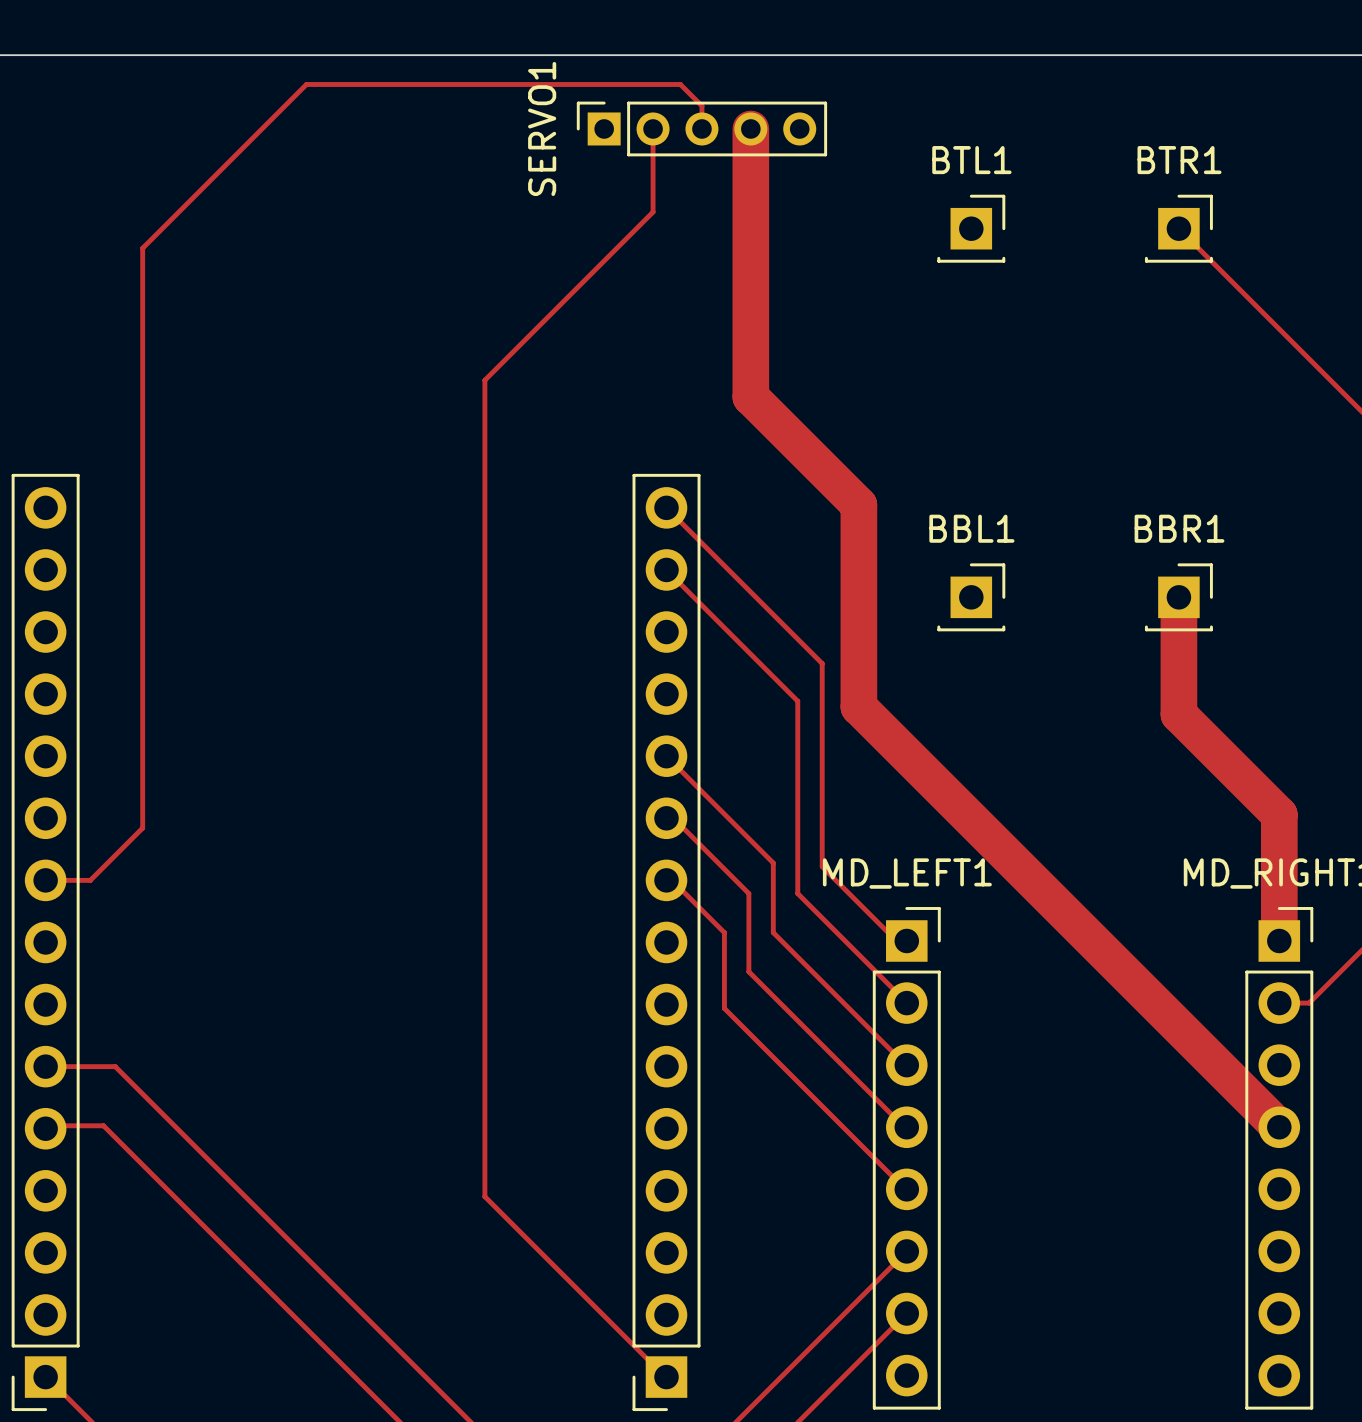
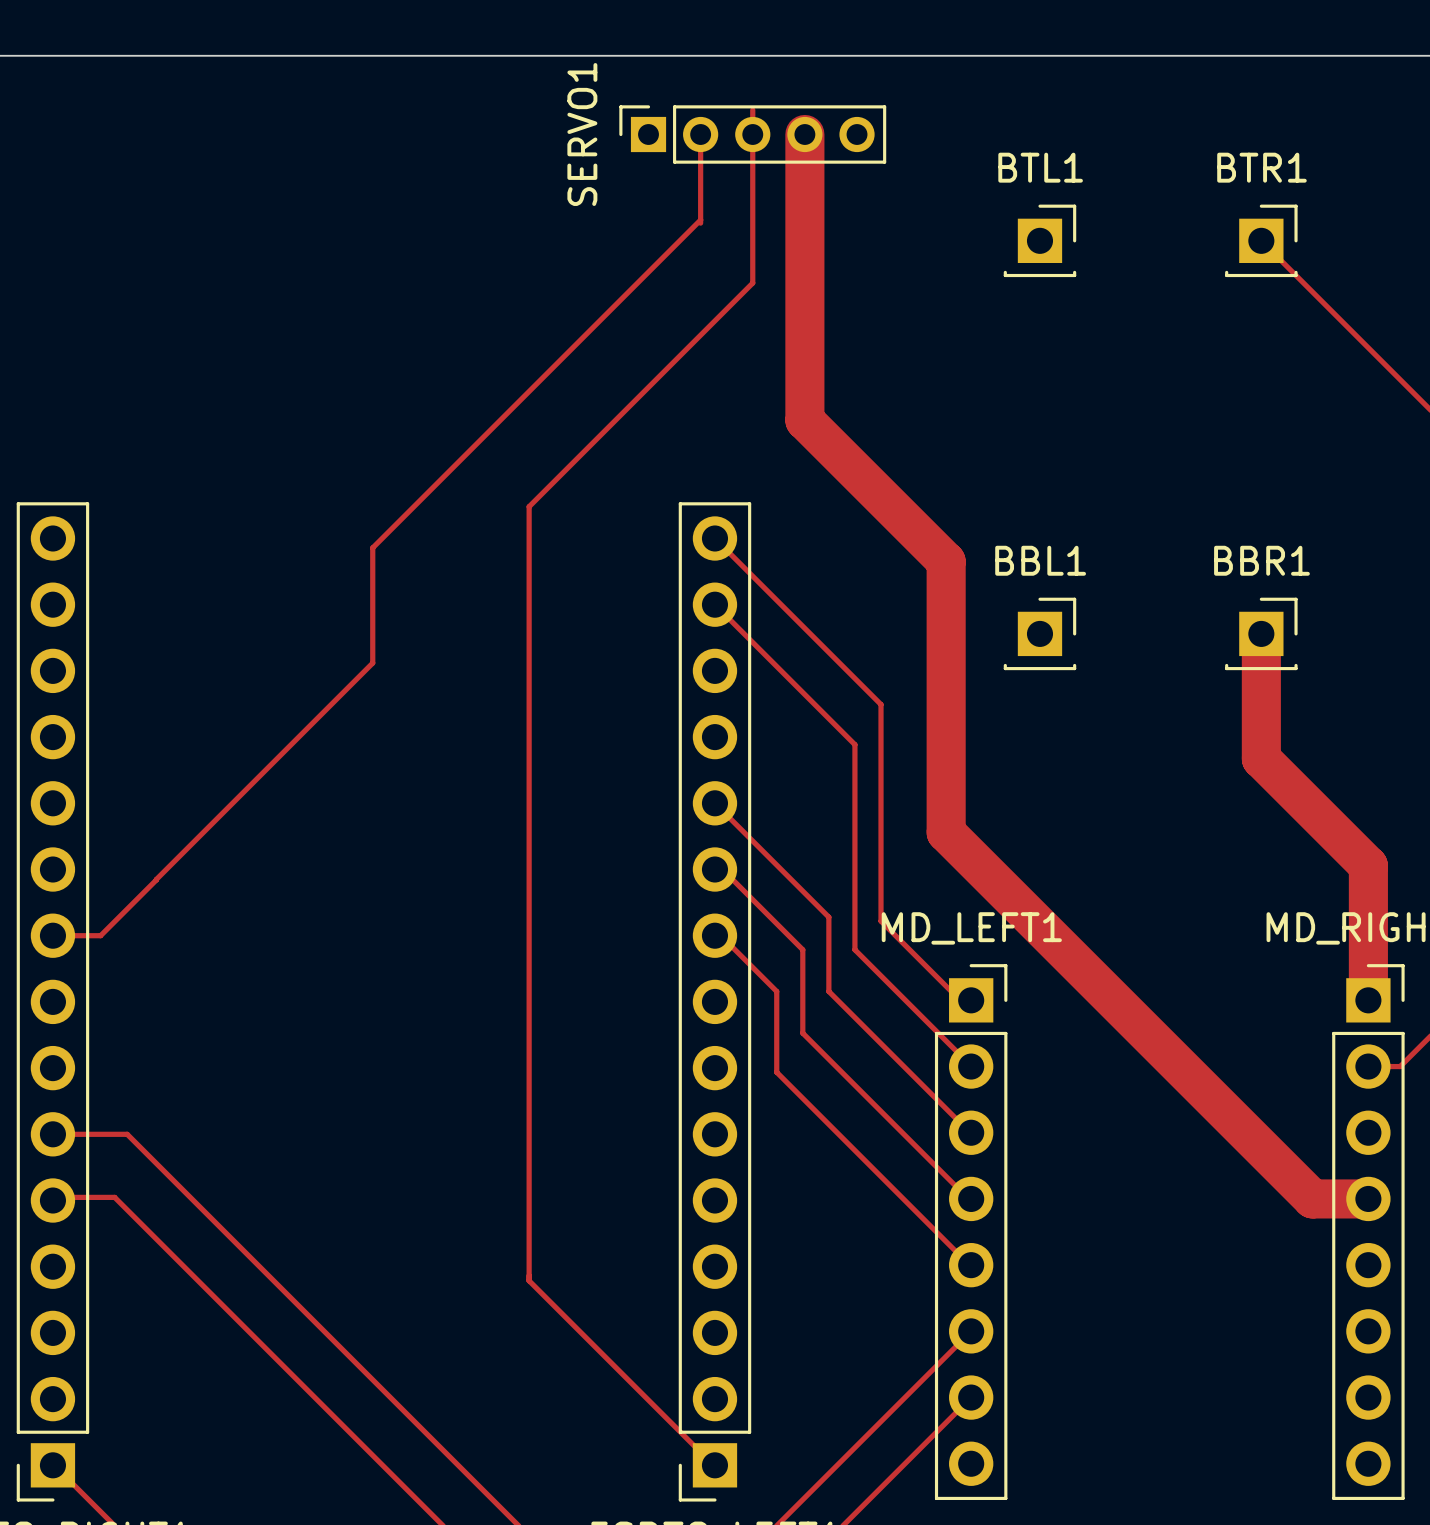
top track: (701, 106) (680, 84) (306, 84) (142, 248) (142, 827) -> (700, 219) (372, 547) (372, 663) (156, 879)
top track: (653, 212) (484, 380) (484, 1196) (492, 1204) -> (752, 134) (752, 283) (529, 506) (529, 1280)
top track: (858, 505) (858, 707) (1279, 1127) -> (920, 535) (946, 561) (946, 832) (1312, 1198) (1368, 1198)

